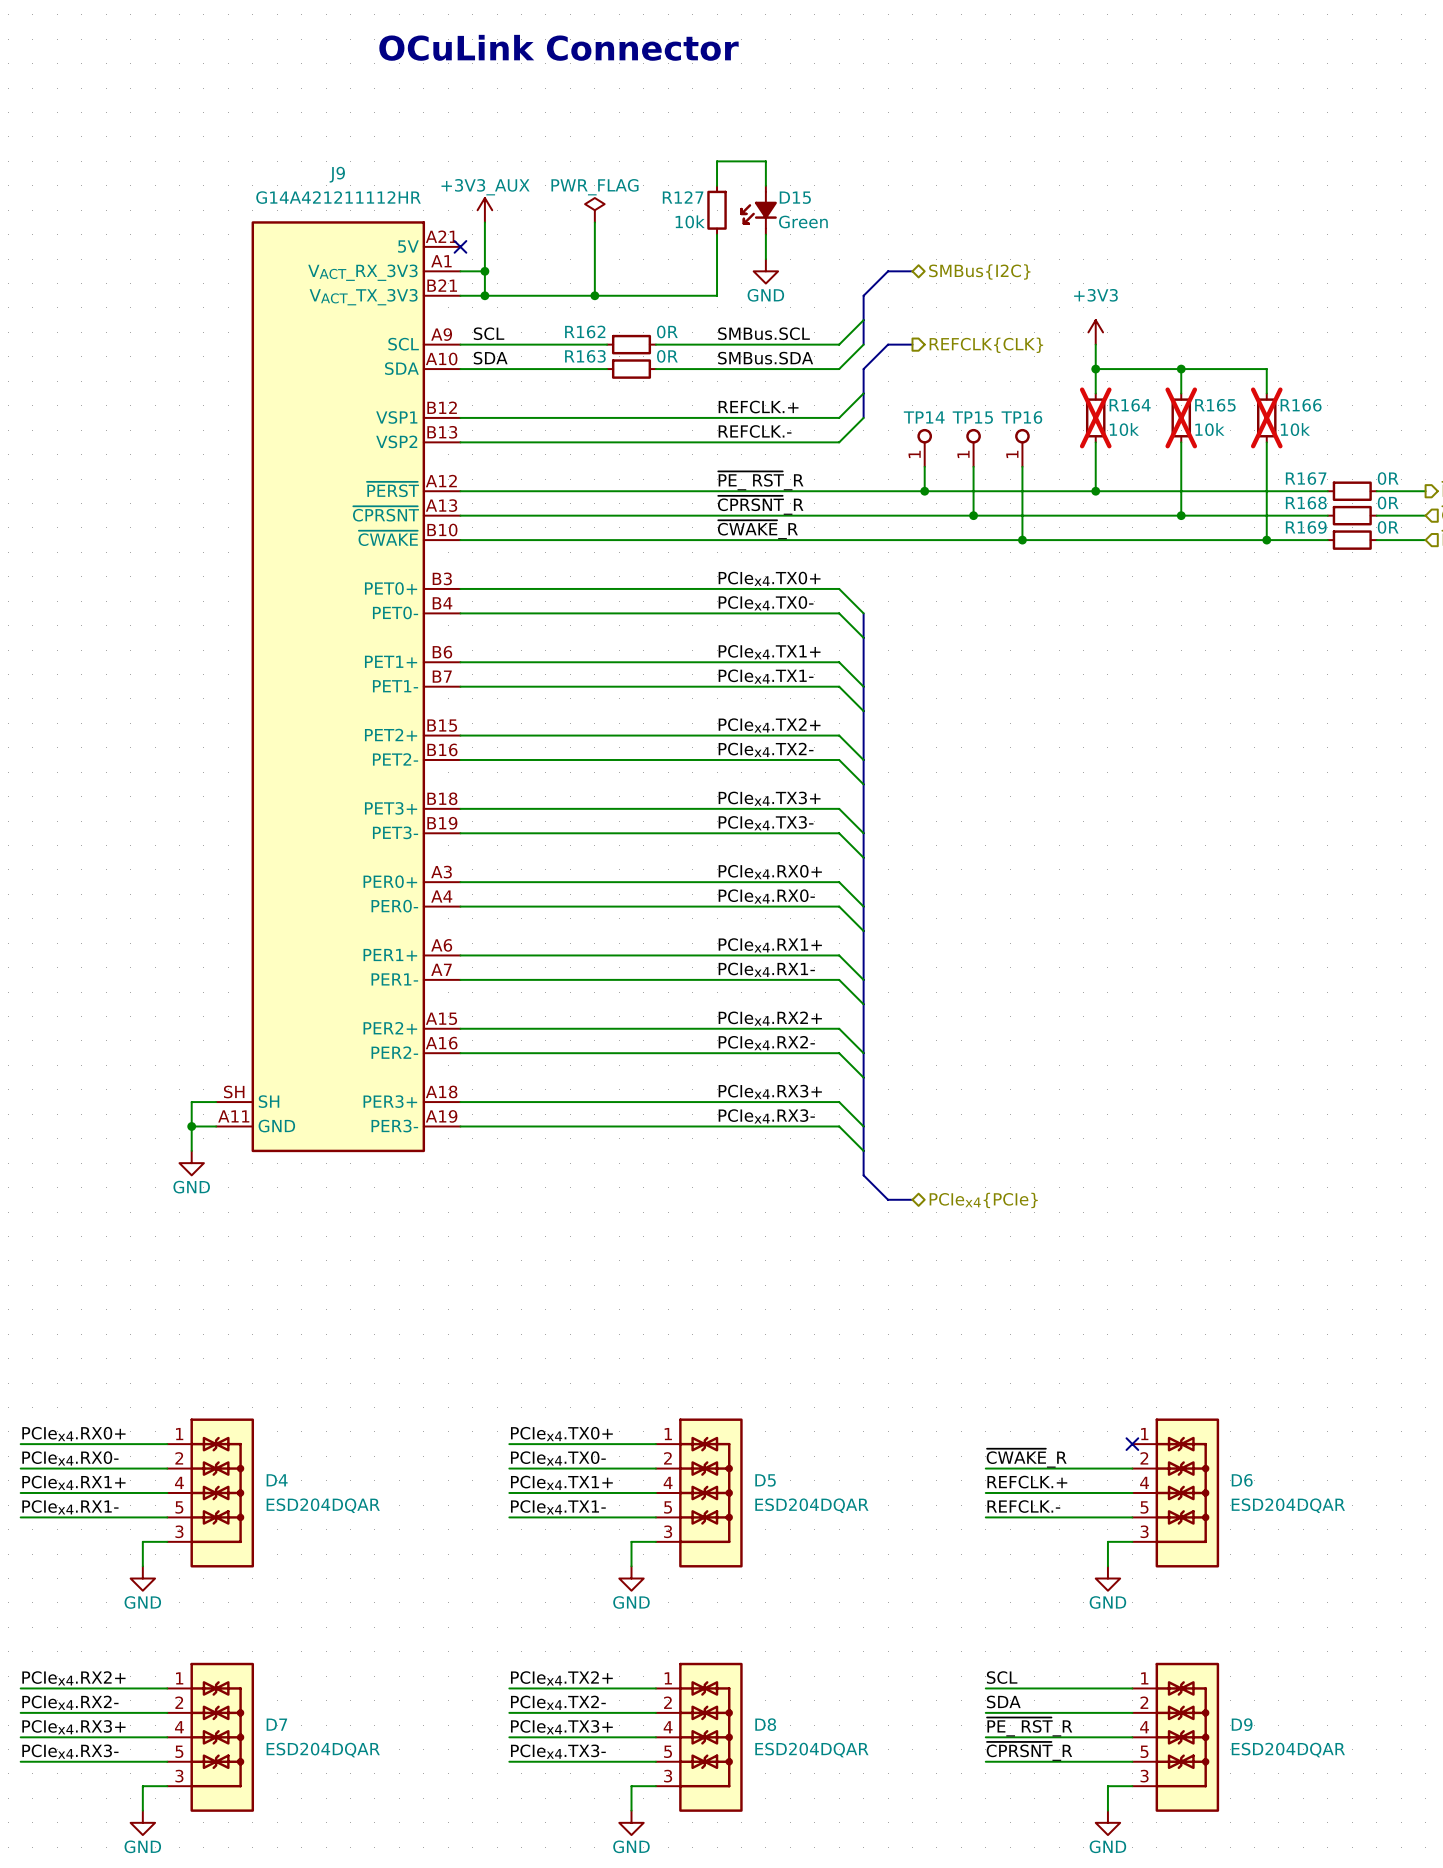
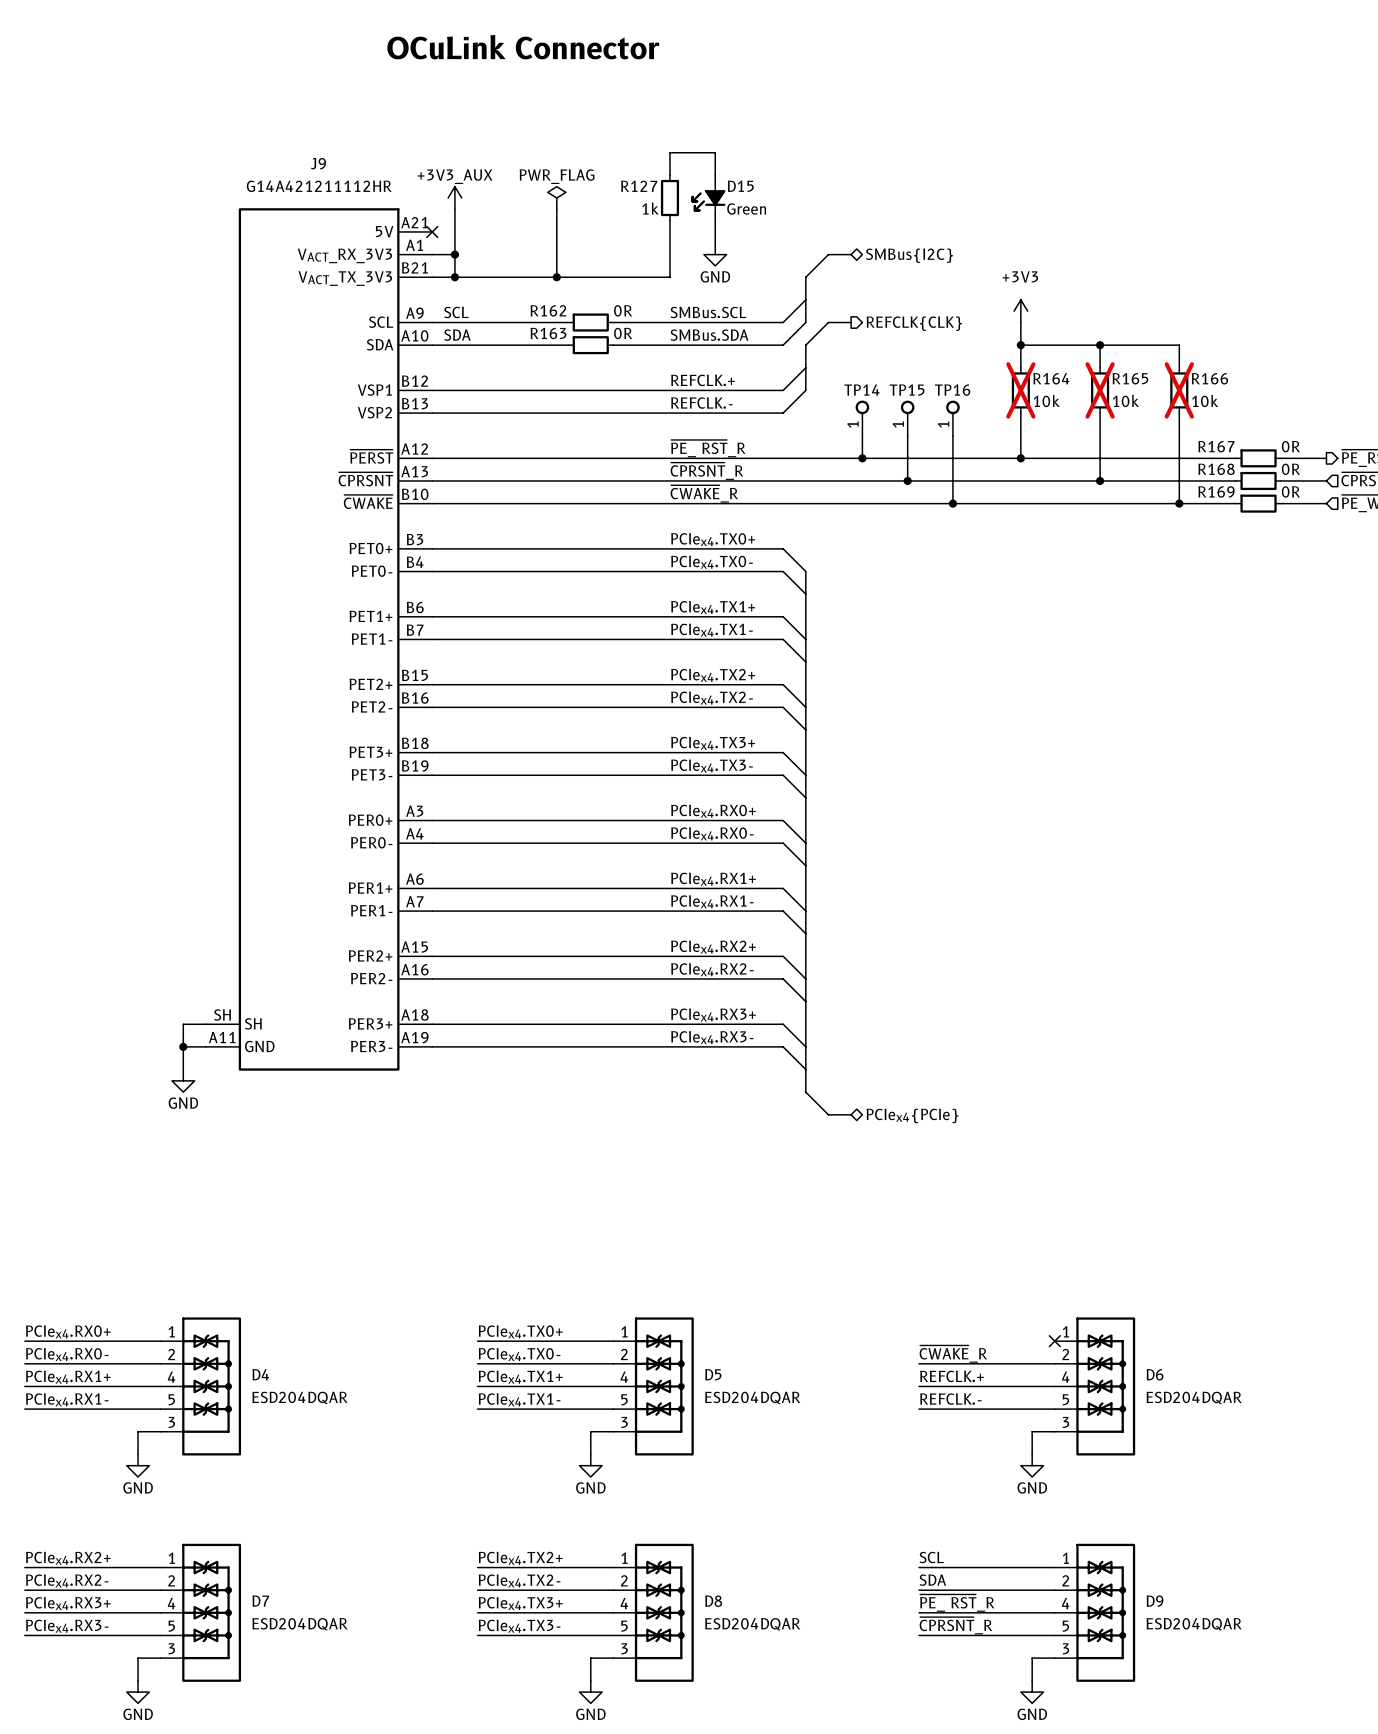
R127 text: 10k (690, 221) -> 1k (650, 208)

